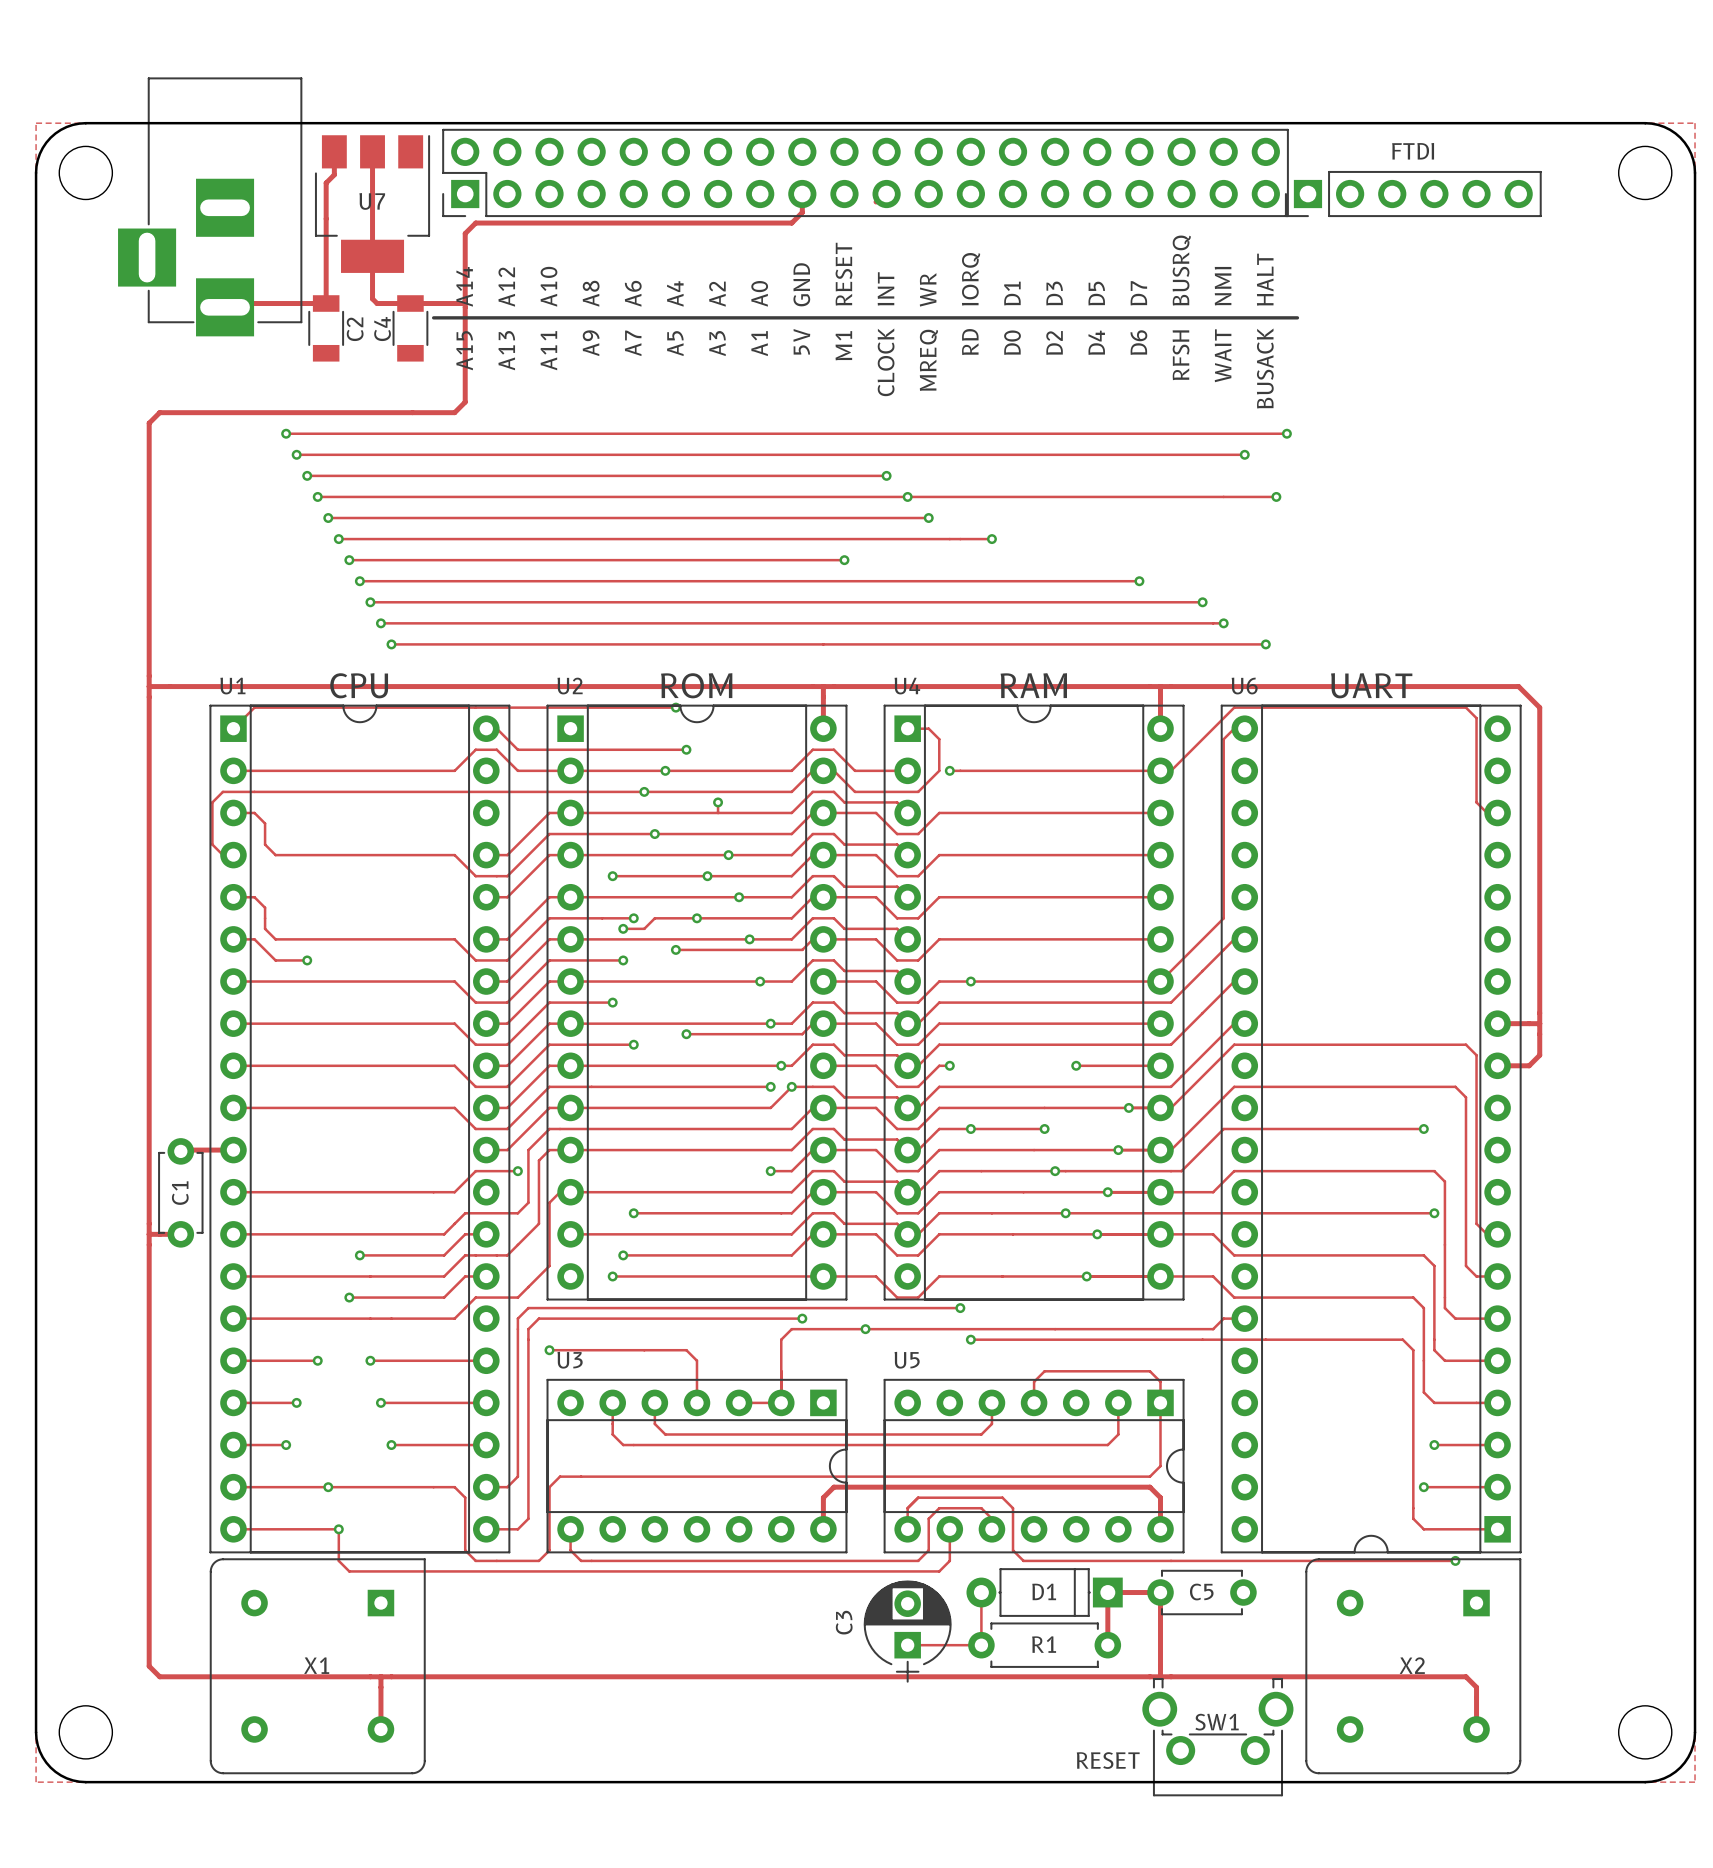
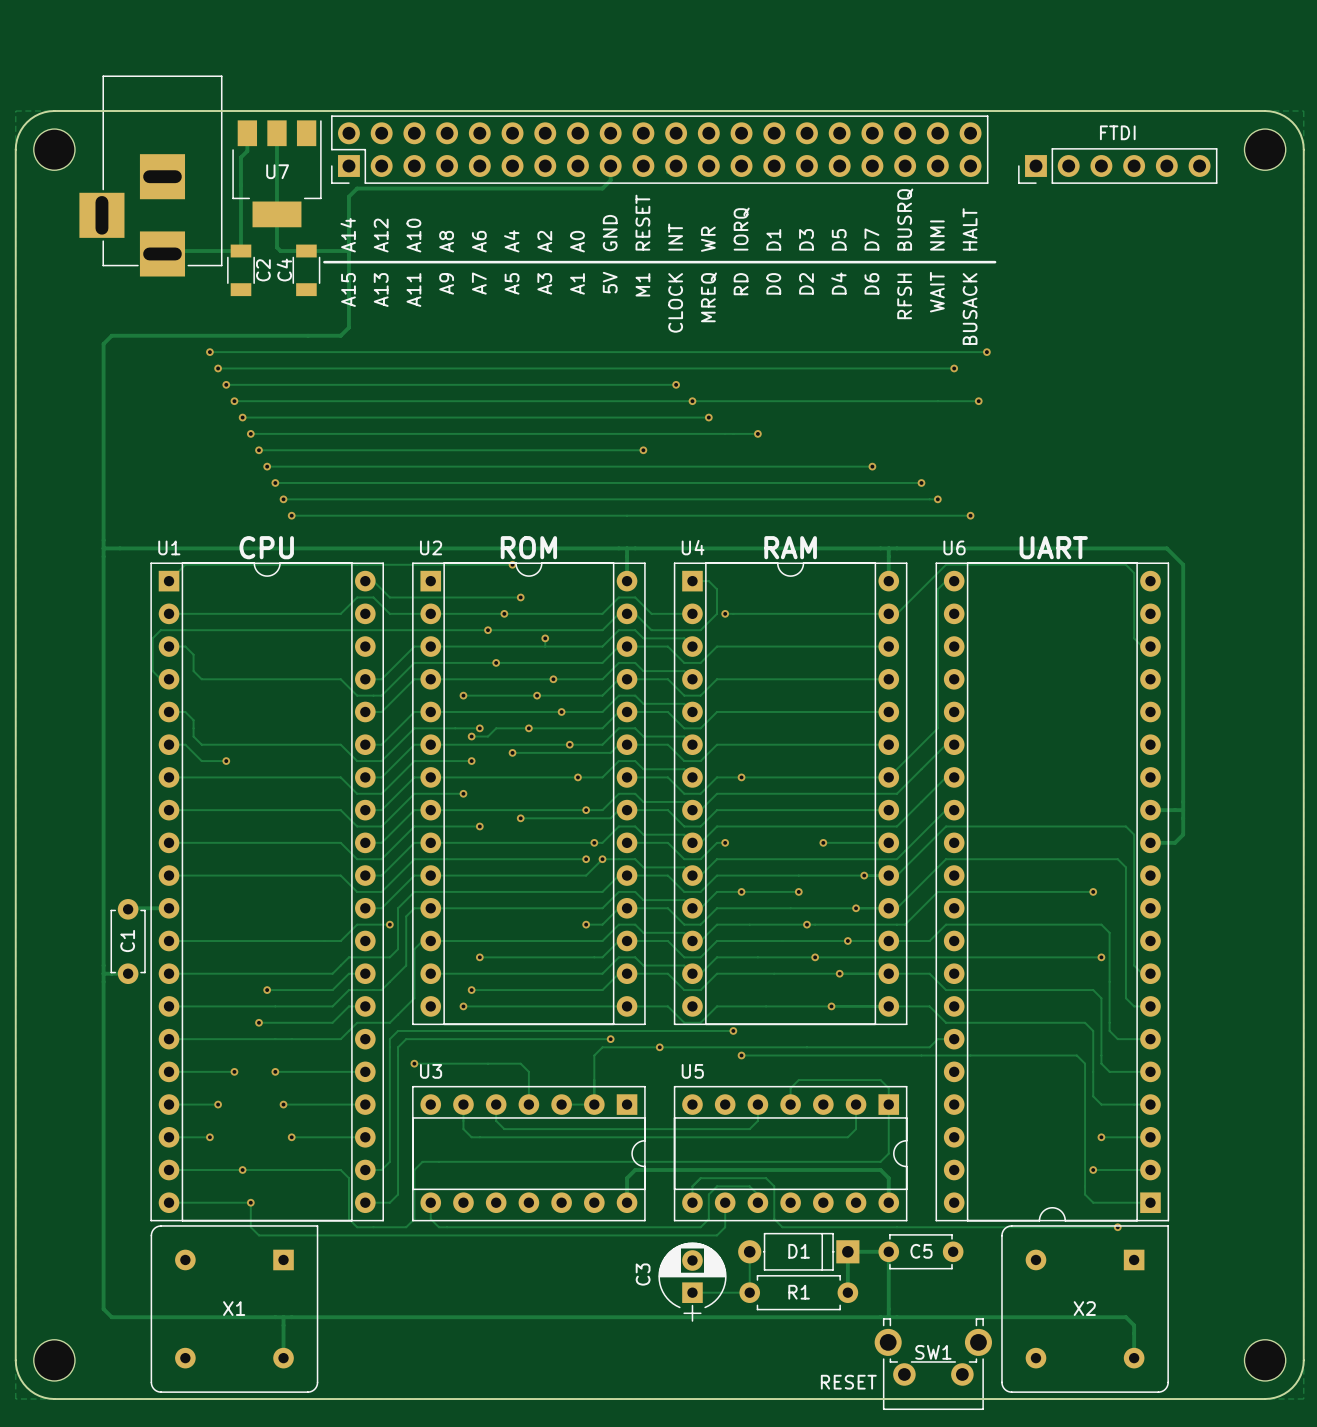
part position: (1413, 194) -> (1117, 166)

